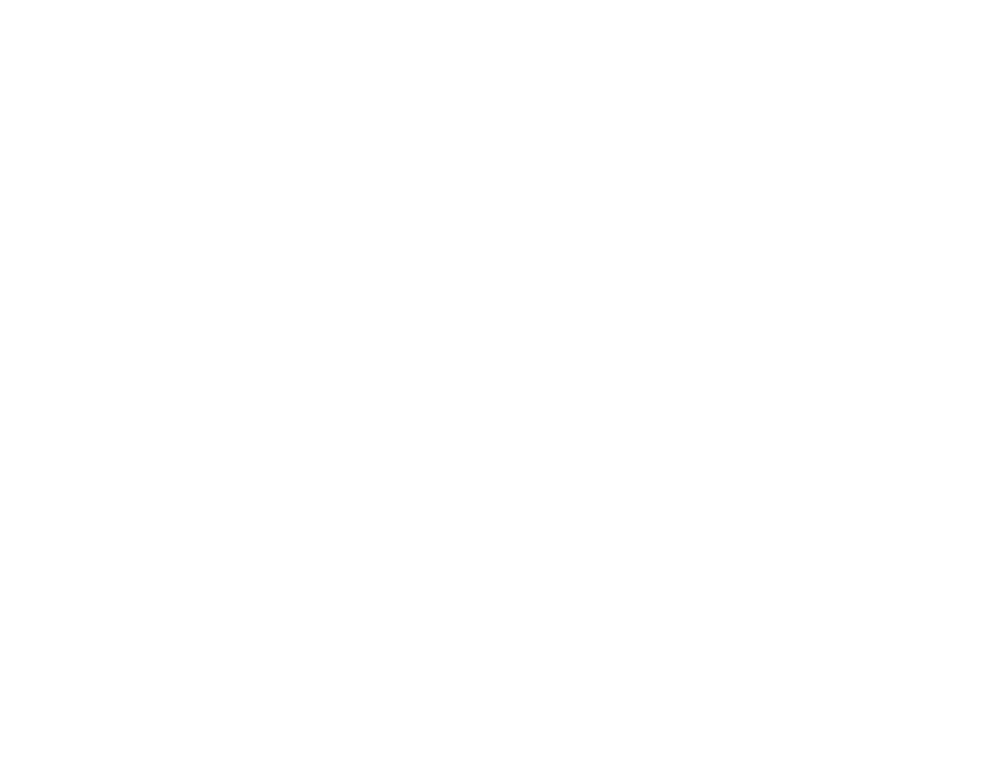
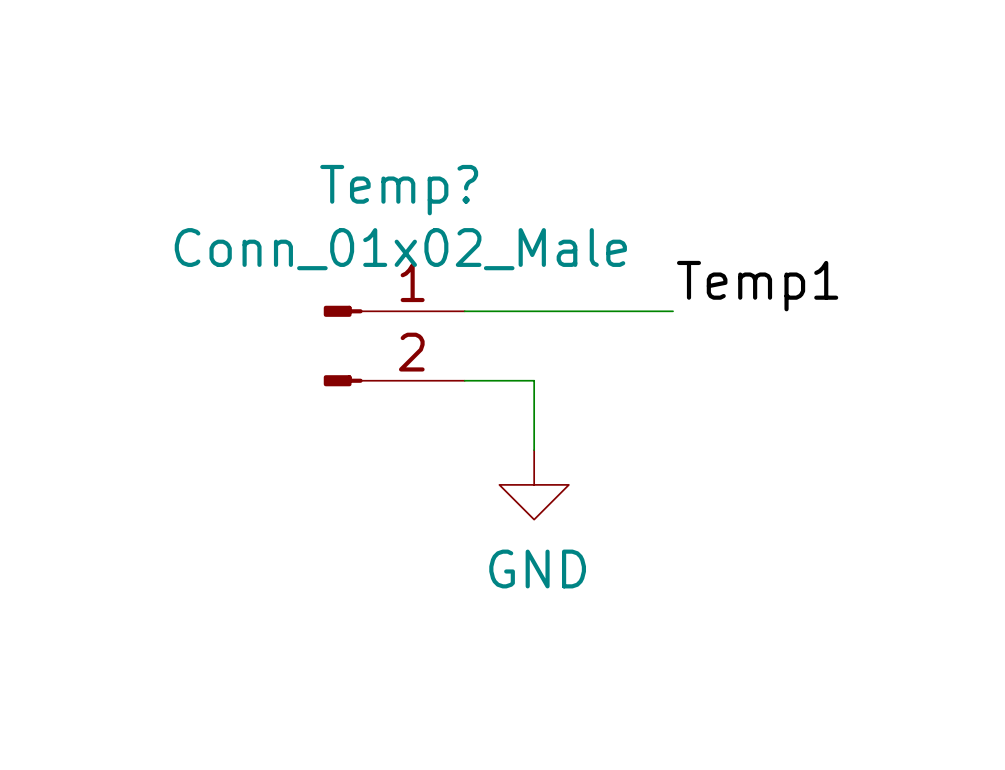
label: none -> Temp1 (757, 286)
wire: none -> (464, 311) (673, 311)
Temp?: none -> Conn_01x02_Male (394, 346)
wire: none -> (464, 380) (534, 380) (534, 450)
power symbol: none -> GND (534, 484)

